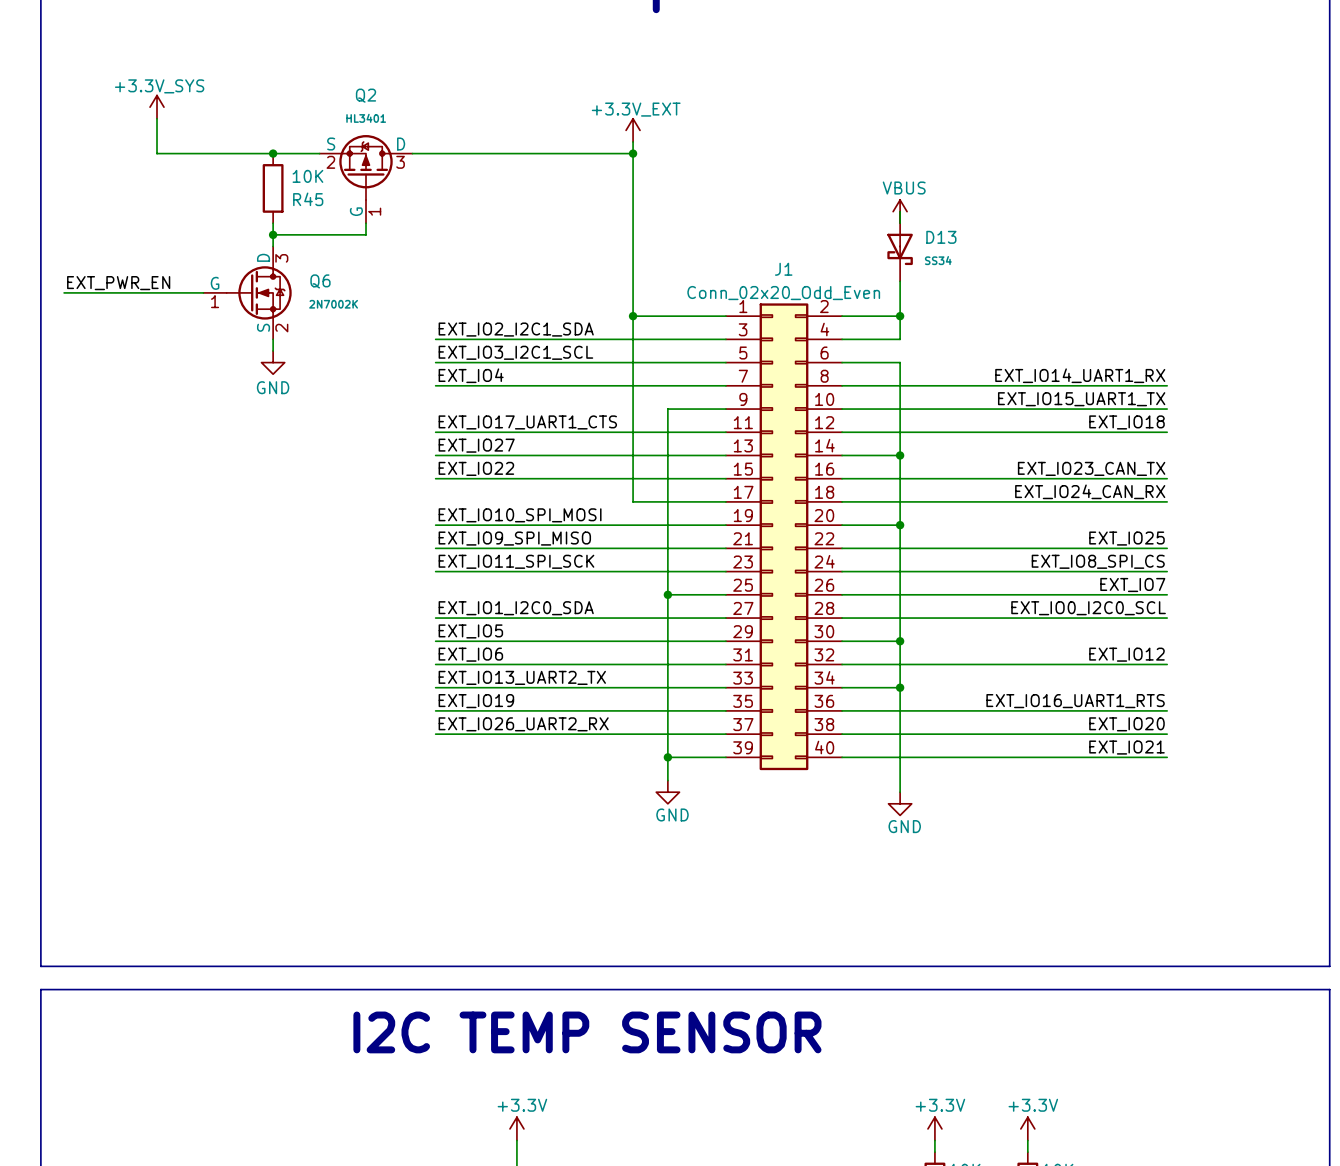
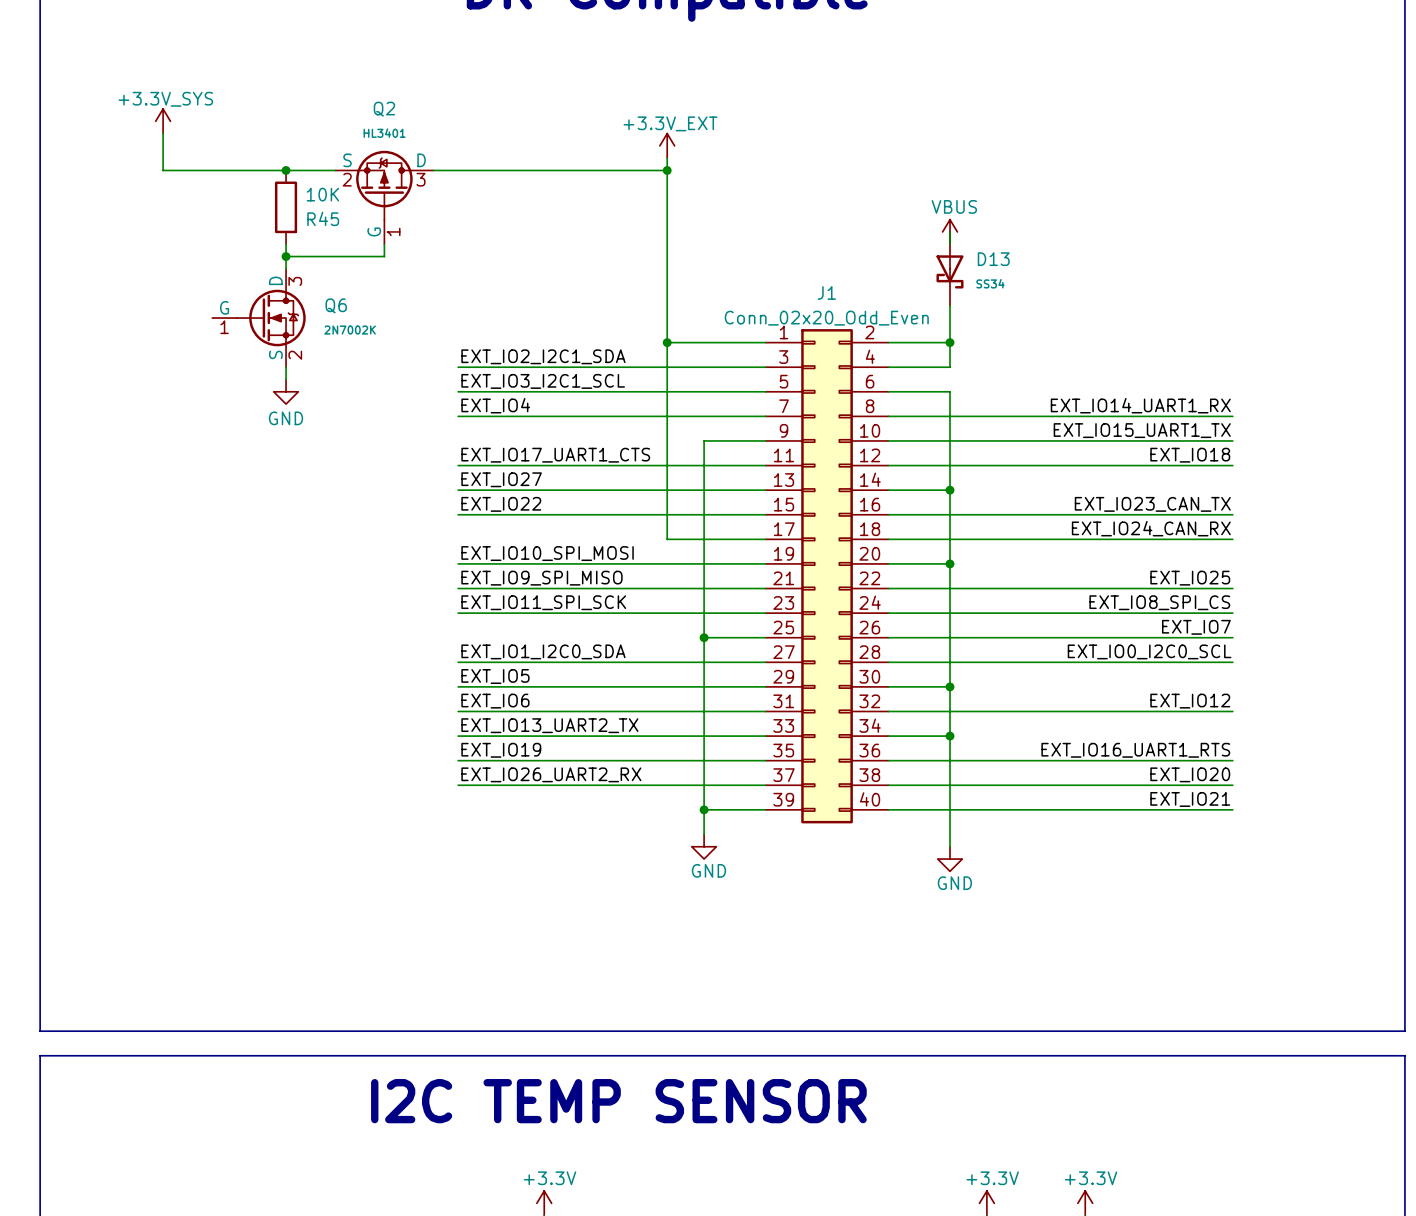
label: EXT_PWR_EN (118, 283) -> none
wire: (64, 292) (203, 292) -> none

